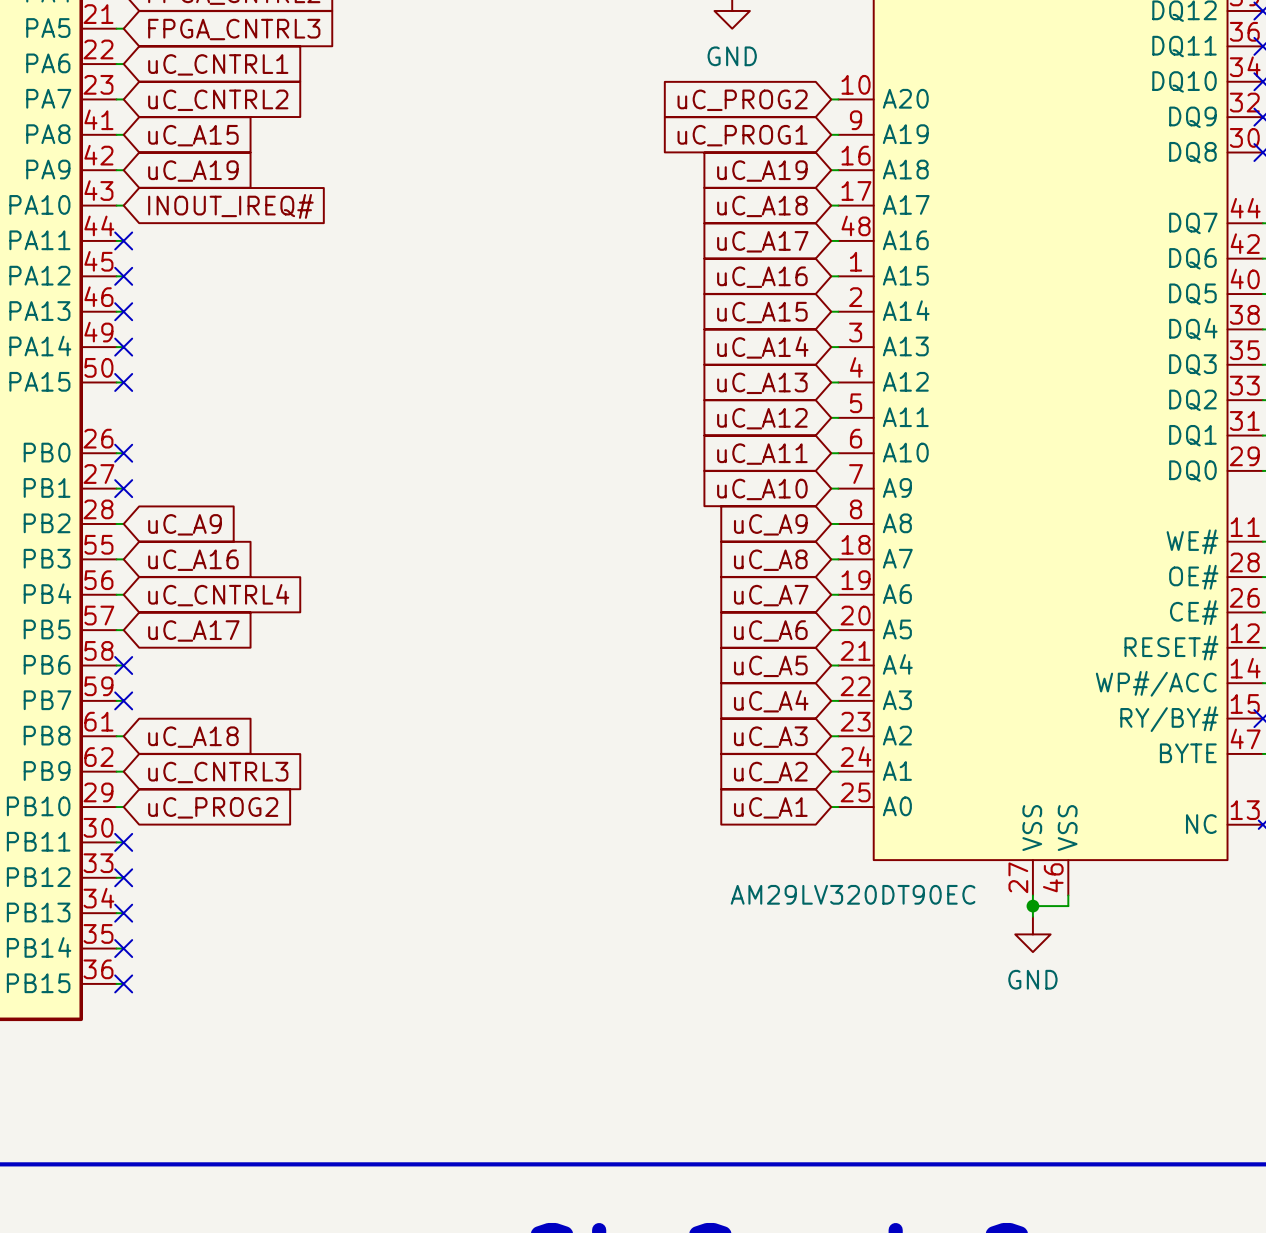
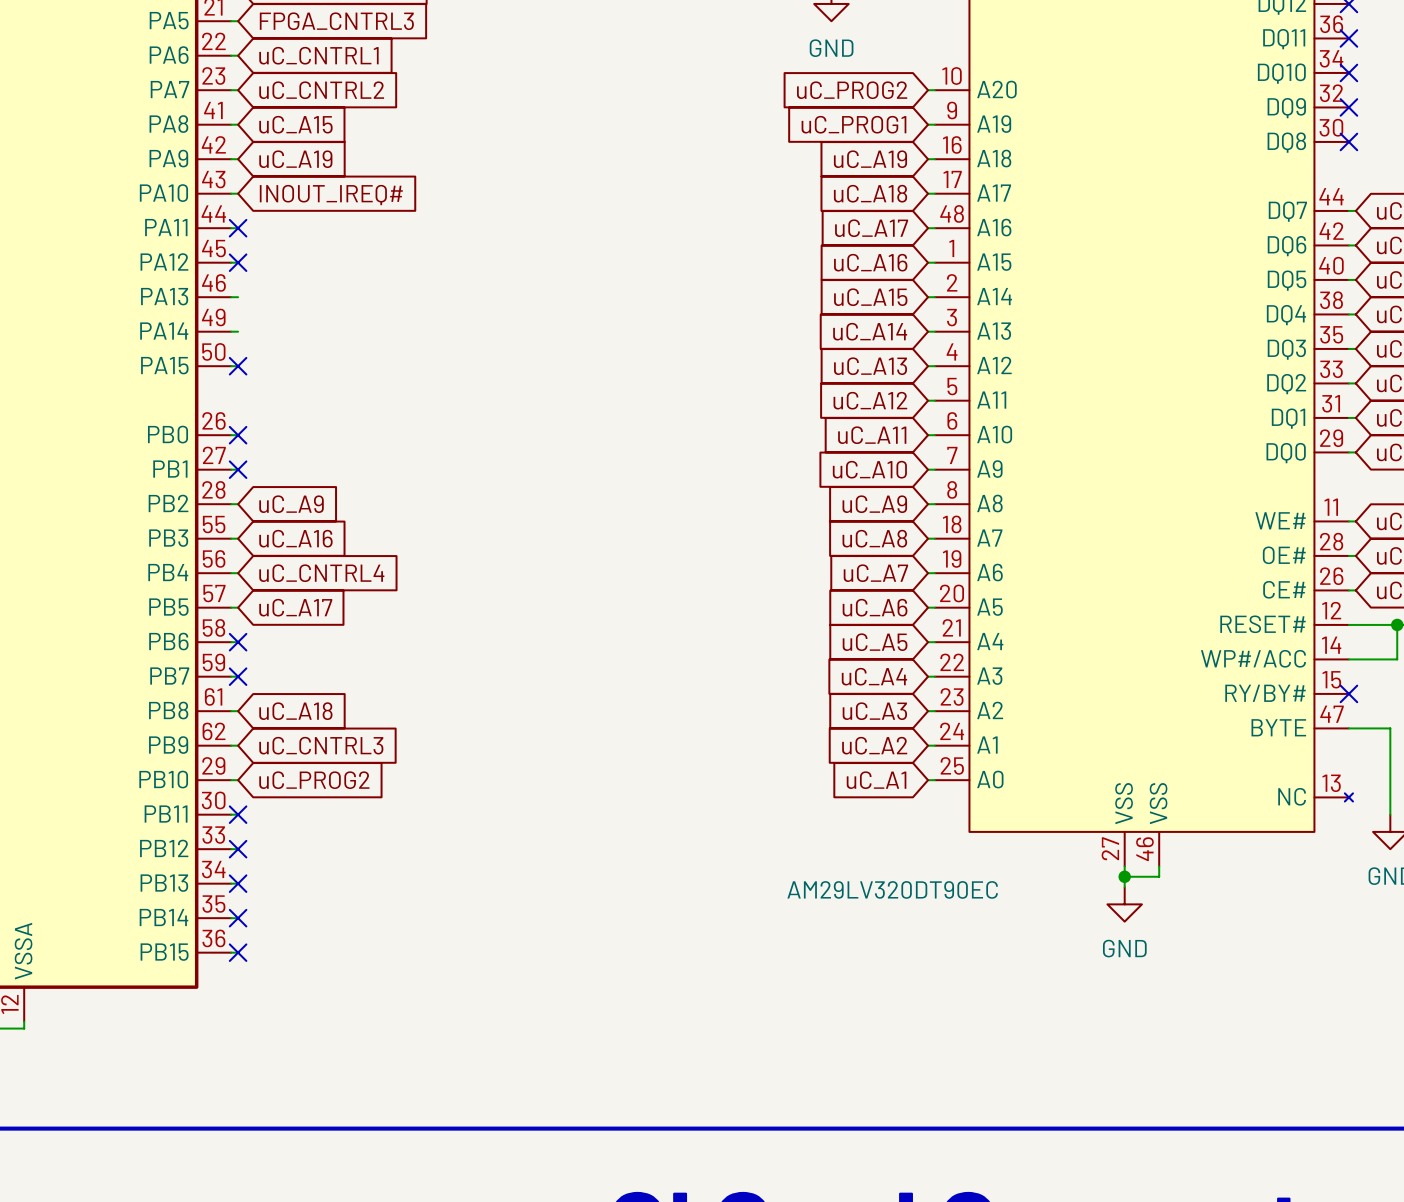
no-connect mark: (123, 311) -> none
no-connect mark: (123, 347) -> none
part value position: AM29LV320DT90EC (853, 894) -> AM29LV320DT90EC (892, 889)

